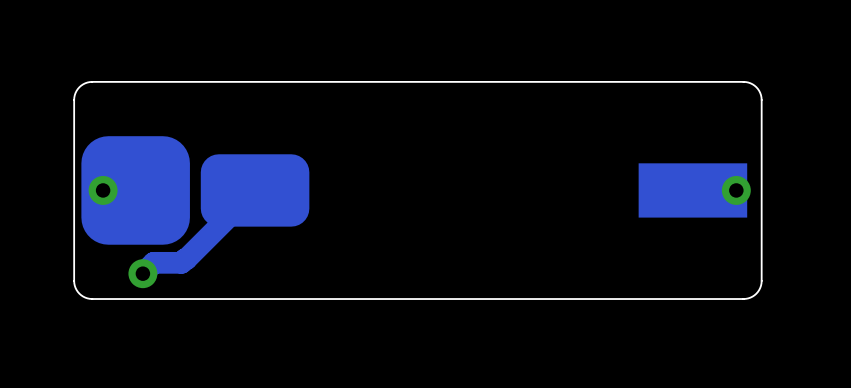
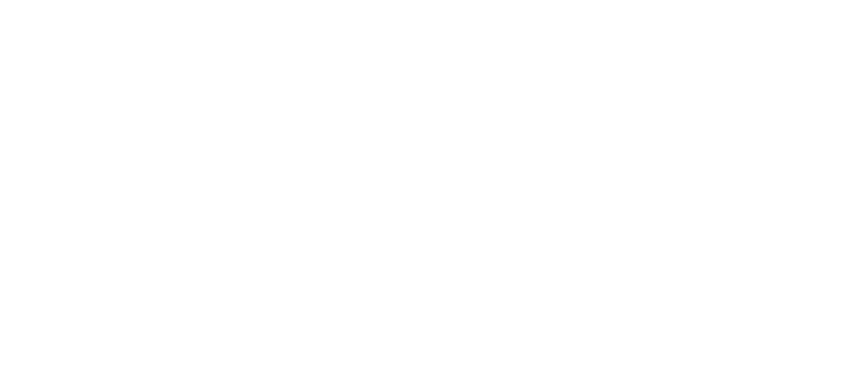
board edge: (743, 81) (87, 82) (77, 88) (74, 99) (74, 285) (81, 295) (92, 299) (748, 298) (757, 291) (761, 283) (761, 99) (756, 87) (743, 81) -> none
via: (103, 190) -> none
part: (135, 190) -> none
track: (255, 190) (181, 262) (153, 262) (142, 273) -> none
part: (255, 190) -> none
part: (692, 190) -> none
via: (736, 190) -> none
via: (142, 273) -> none

